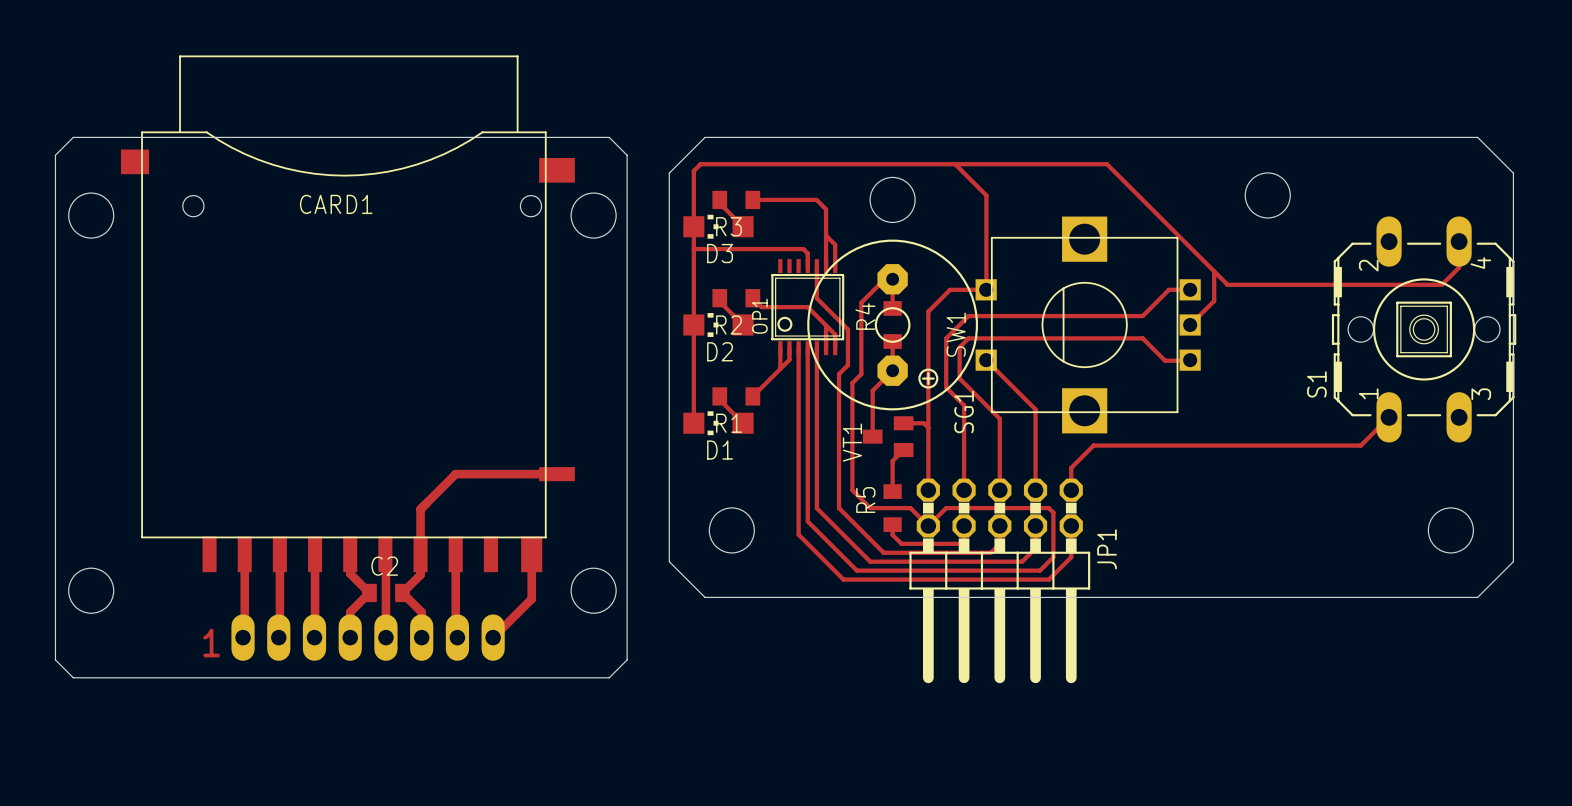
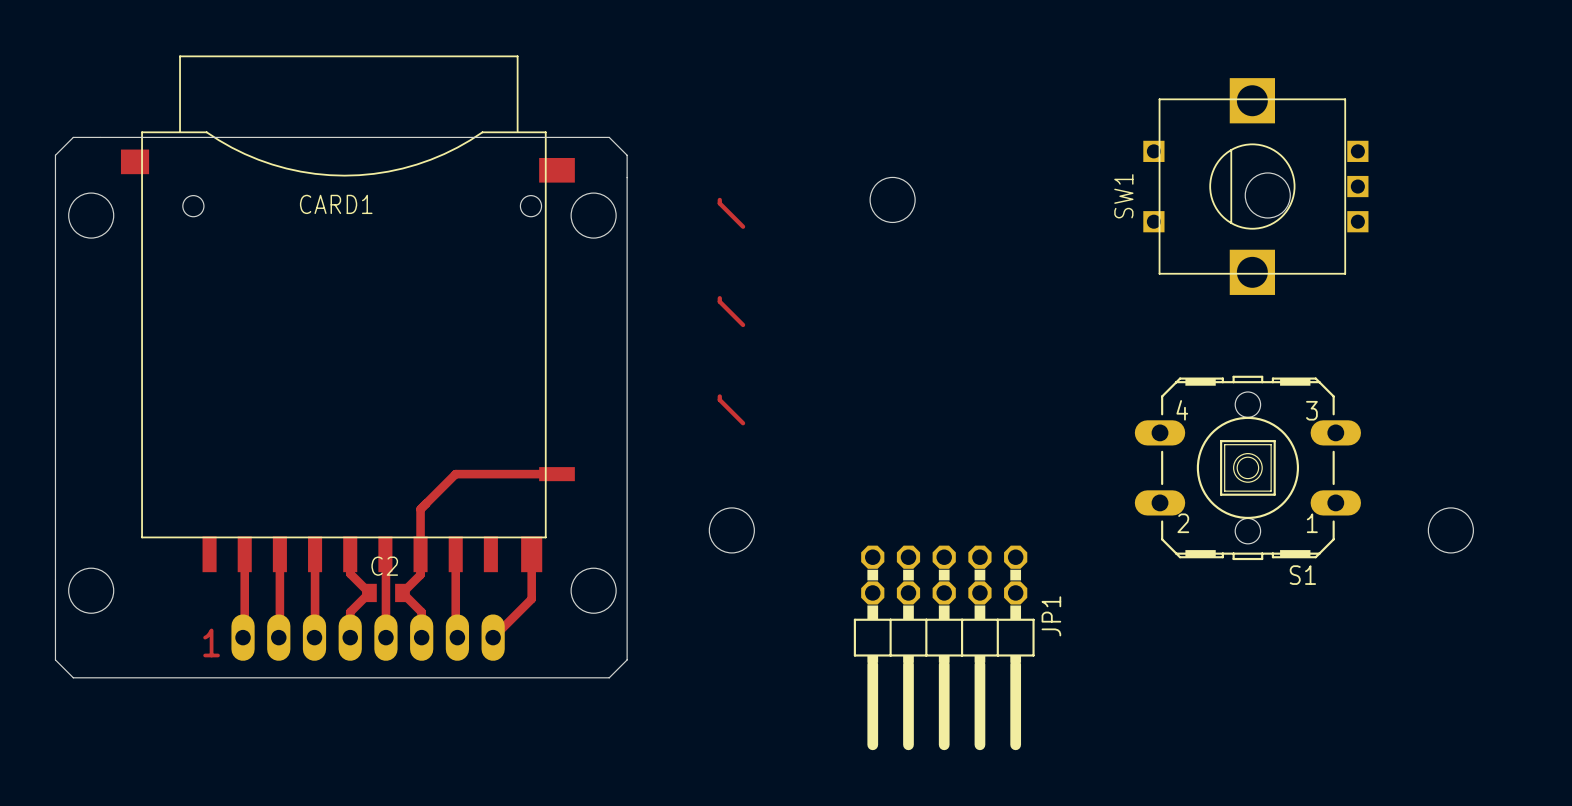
board edge: (705, 137) (1477, 137) (1513, 173) (1513, 561) (1477, 597) (705, 597) (669, 561) (669, 173) (705, 137) -> none
track: (955, 164) (986, 195) (986, 289) (950, 289) (928, 311) (928, 490) -> none
R3: (736, 199) -> none
track: (752, 199) (816, 199) (826, 209) (826, 266) -> none
S1 footprint: [1331, 216, 1517, 443] -> [1134, 375, 1361, 561]
D3: (718, 226) -> none
track: (826, 235) (835, 244) (835, 266) -> none
track: (1459, 241) (1459, 267) (1441, 284) (1227, 284) (1107, 164) (700, 164) (693, 170) (693, 423) -> none
track: (693, 249) (803, 249) (807, 253) (807, 266) -> none
track: (816, 266) (816, 298) (847, 329) (847, 365) (839, 374) (839, 508) (883, 552) (990, 552) (999, 543) (999, 525) -> none
track: (1214, 271) (1214, 300) (1190, 324) -> none
track: (1190, 289) (1168, 289) (1142, 316) (968, 316) (946, 338) (946, 387) (964, 405) (964, 490) -> none
R2: (736, 298) -> none
track: (752, 298) (761, 307) (807, 307) (835, 334) (835, 348) -> none
OP1: (807, 307) -> none
track: (892, 308) (892, 279) (884, 279) (861, 302) (861, 374) (852, 383) (852, 490) (870, 508) (910, 508) (928, 525) (946, 508) (1048, 508) (1053, 512) (1053, 557) (1040, 570) (856, 570) (807, 521) (807, 348) -> none
D2: (718, 324) -> none
SG1: (892, 324) -> none
R4: (892, 324) -> none
SW1 position: (1088, 324) -> (1255, 186)
track: (826, 325) (826, 348) -> none
track: (892, 341) (892, 370) (872, 390) (872, 436) -> none
track: (780, 348) (780, 368) -> none
track: (789, 348) (789, 359) (752, 396) -> none
track: (798, 348) (798, 534) (843, 579) (1048, 579) (1071, 557) (1071, 525) -> none
track: (816, 348) (816, 508) (870, 561) (1022, 561) (1035, 548) (1035, 525) -> none
track: (986, 360) (1035, 409) (1035, 490) -> none
track: (1190, 360) (1165, 360) (1142, 338) (968, 338) (959, 347) (959, 378) (999, 418) (999, 490) -> none
S1 name position: S1 (1316, 384) -> S1 (1302, 575)
R1: (736, 396) -> none
track: (1389, 417) (1360, 445) (1093, 445) (1071, 467) (1071, 490) -> none
D1: (718, 423) -> none
track: (903, 423) (923, 423) (928, 427) -> none
VT1: (888, 436) -> none
track: (903, 450) (892, 461) (892, 491) -> none
R5: (892, 508) -> none
track: (892, 524) (892, 534) (901, 543) (959, 543) (964, 539) (964, 525) -> none
JP1 position: (999, 580) -> (944, 647)

